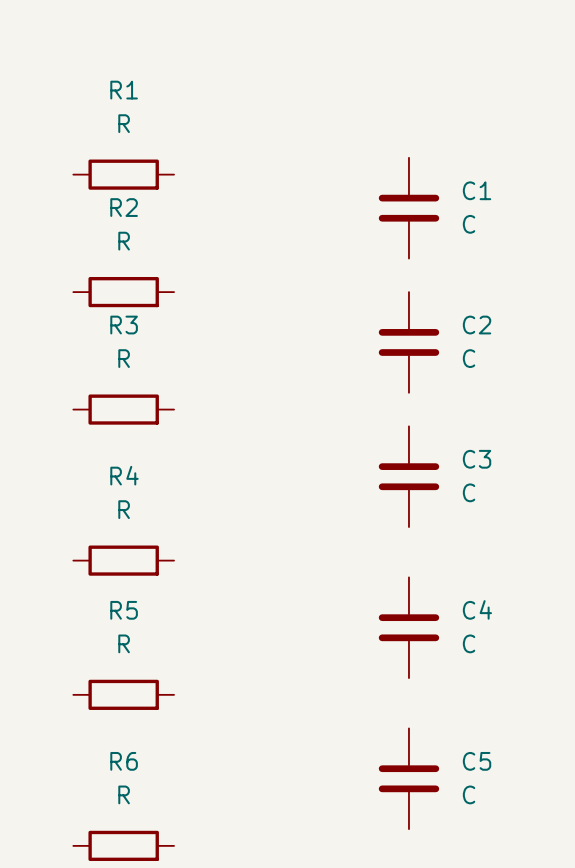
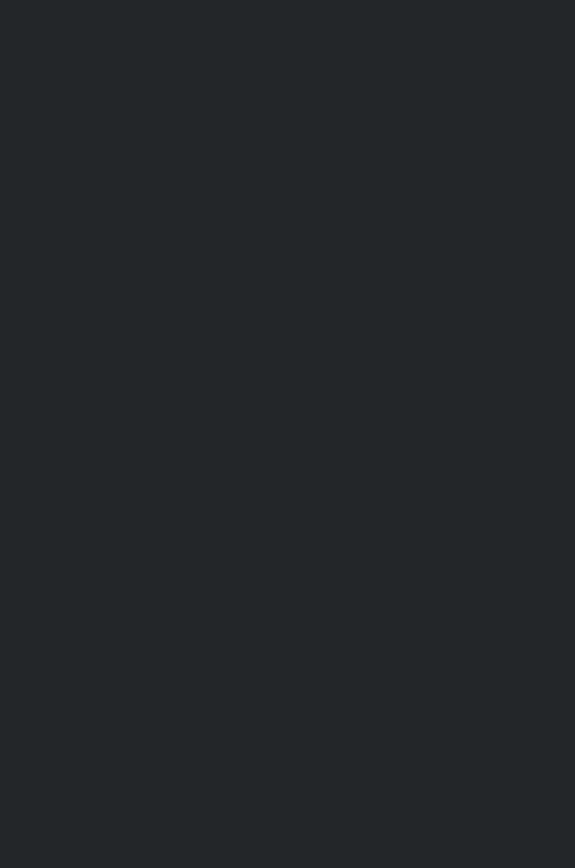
R1: R (123, 174) -> none
C1: C (408, 208) -> none
R2: R (123, 292) -> none
C2: C (408, 342) -> none
R3: R (123, 409) -> none
C3: C (408, 476) -> none
R4: R (123, 560) -> none
C4: C (408, 627) -> none
R5: R (123, 694) -> none
C5: C (408, 778) -> none
R6: R (123, 845) -> none

